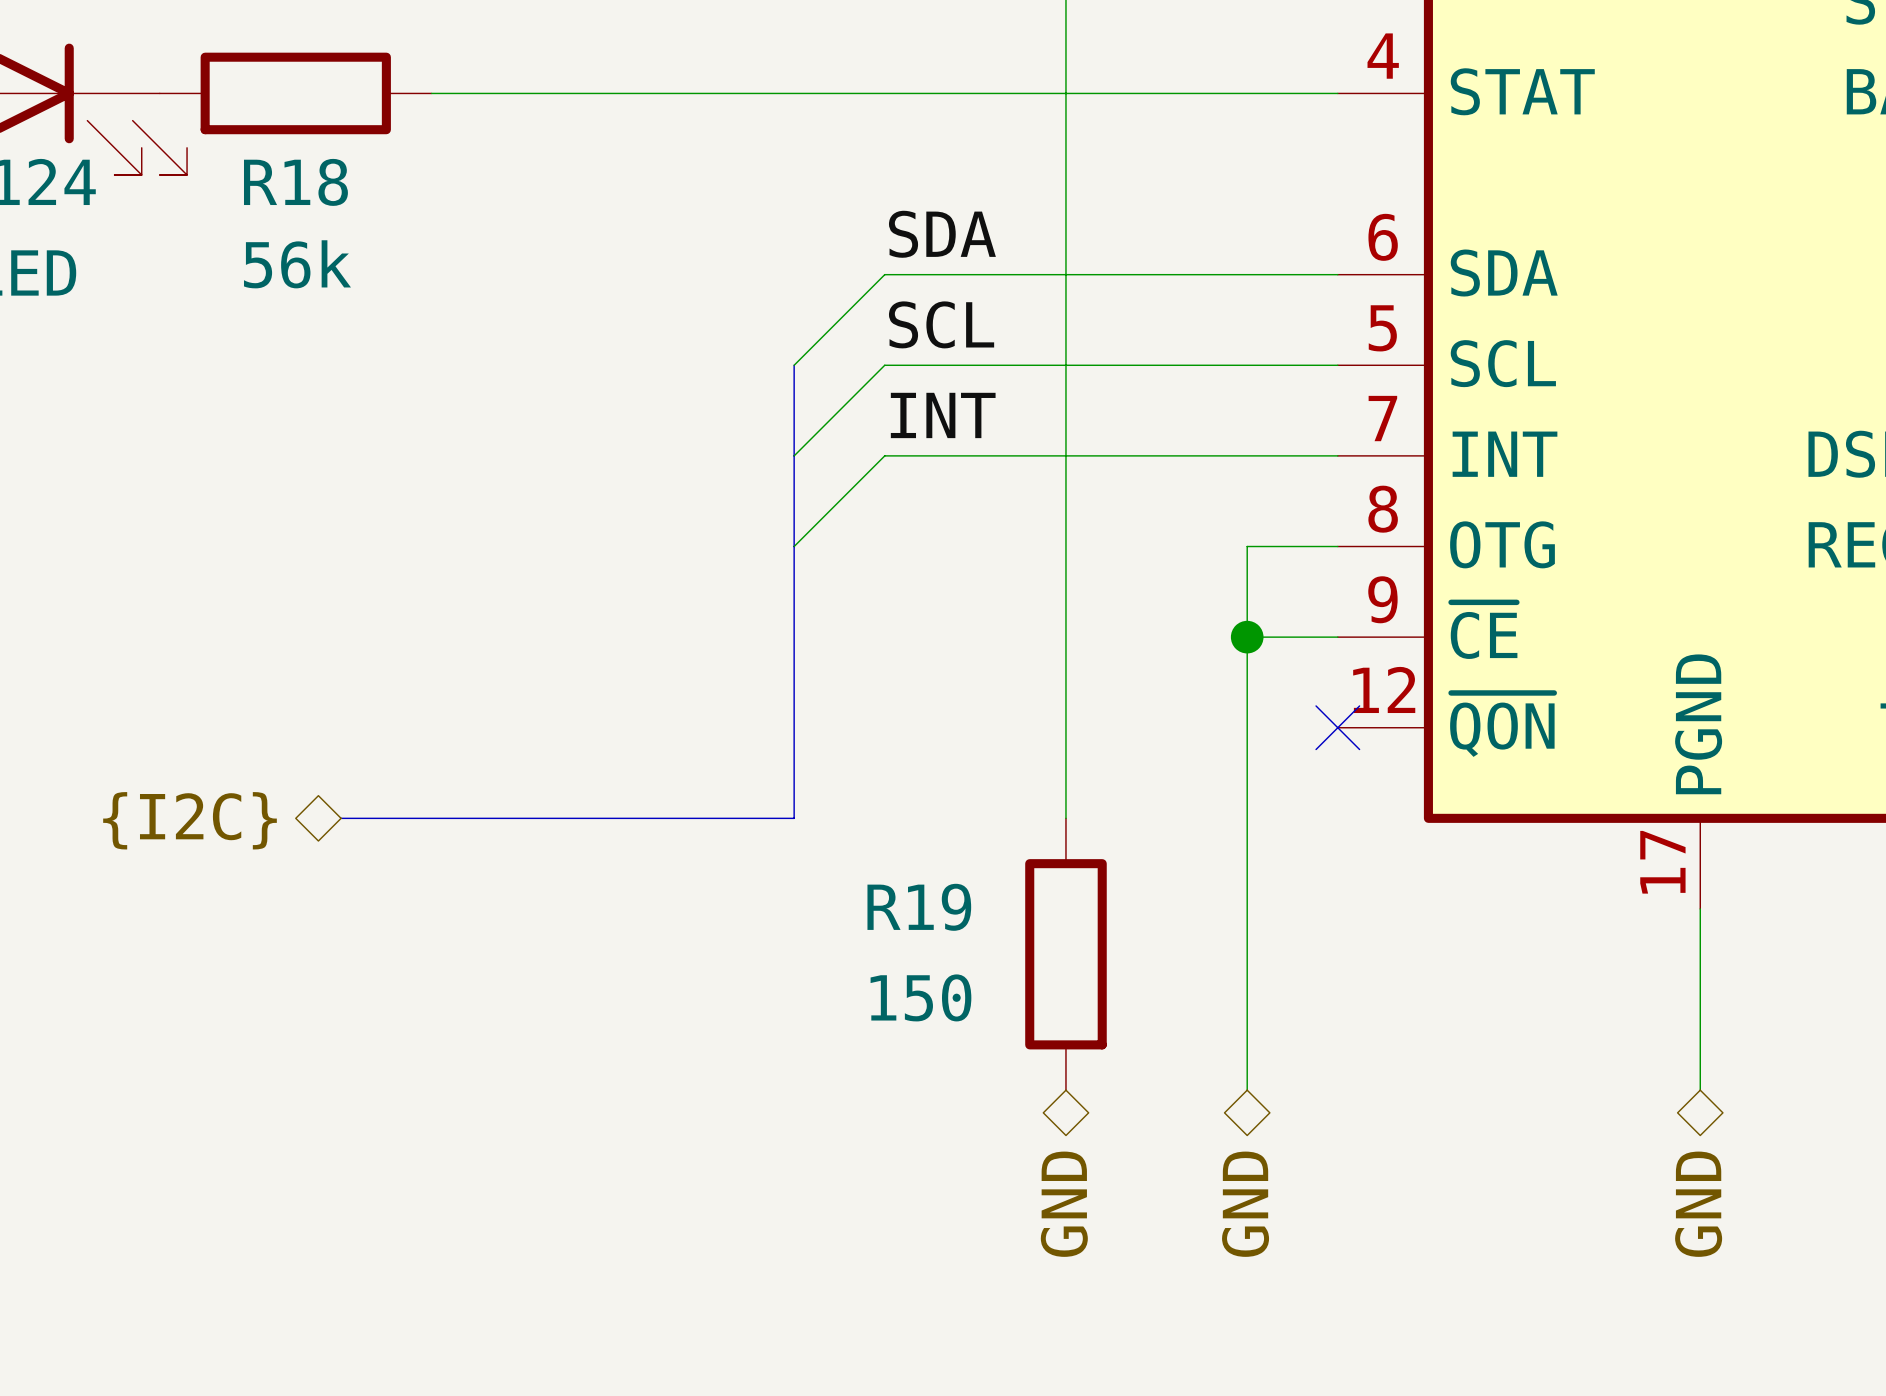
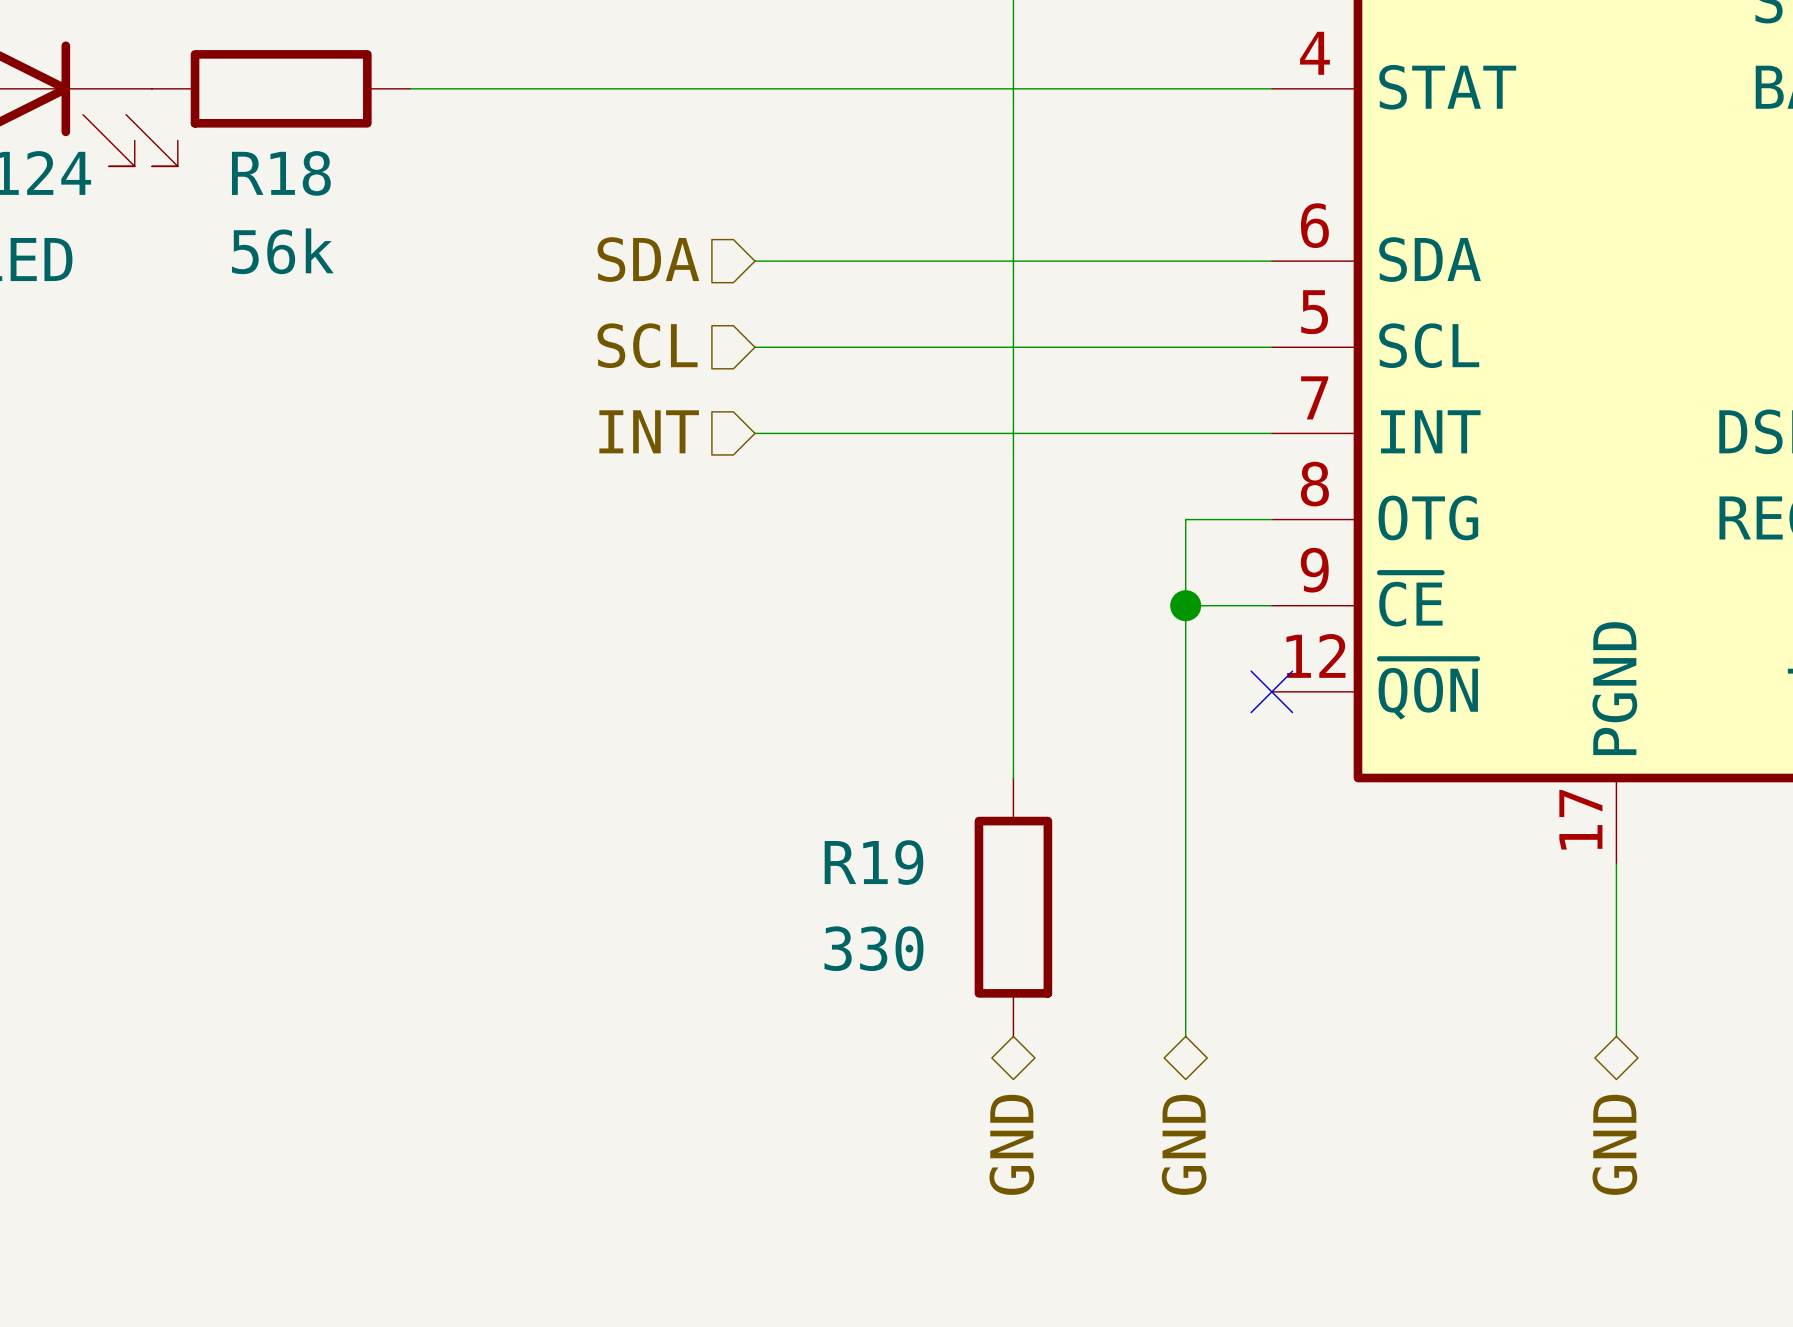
label: SDA (942, 234) -> none
hierarchical label: none -> SDA (648, 259)
wire: (884, 274) (794, 365) -> (841, 261) (754, 261)
label: SCL (941, 324) -> none
hierarchical label: none -> SCL (647, 345)
bus: (794, 365) (794, 818) (341, 818) -> none
wire: (884, 365) (794, 455) -> (841, 347) (754, 347)
label: INT (943, 415) -> none
hierarchical label: none -> INT (649, 431)
wire: (884, 455) (794, 546) -> (841, 433) (754, 433)
hierarchical label: {I2C} (190, 820) -> none
R19 value: 150 (920, 997) -> 330 (873, 948)

